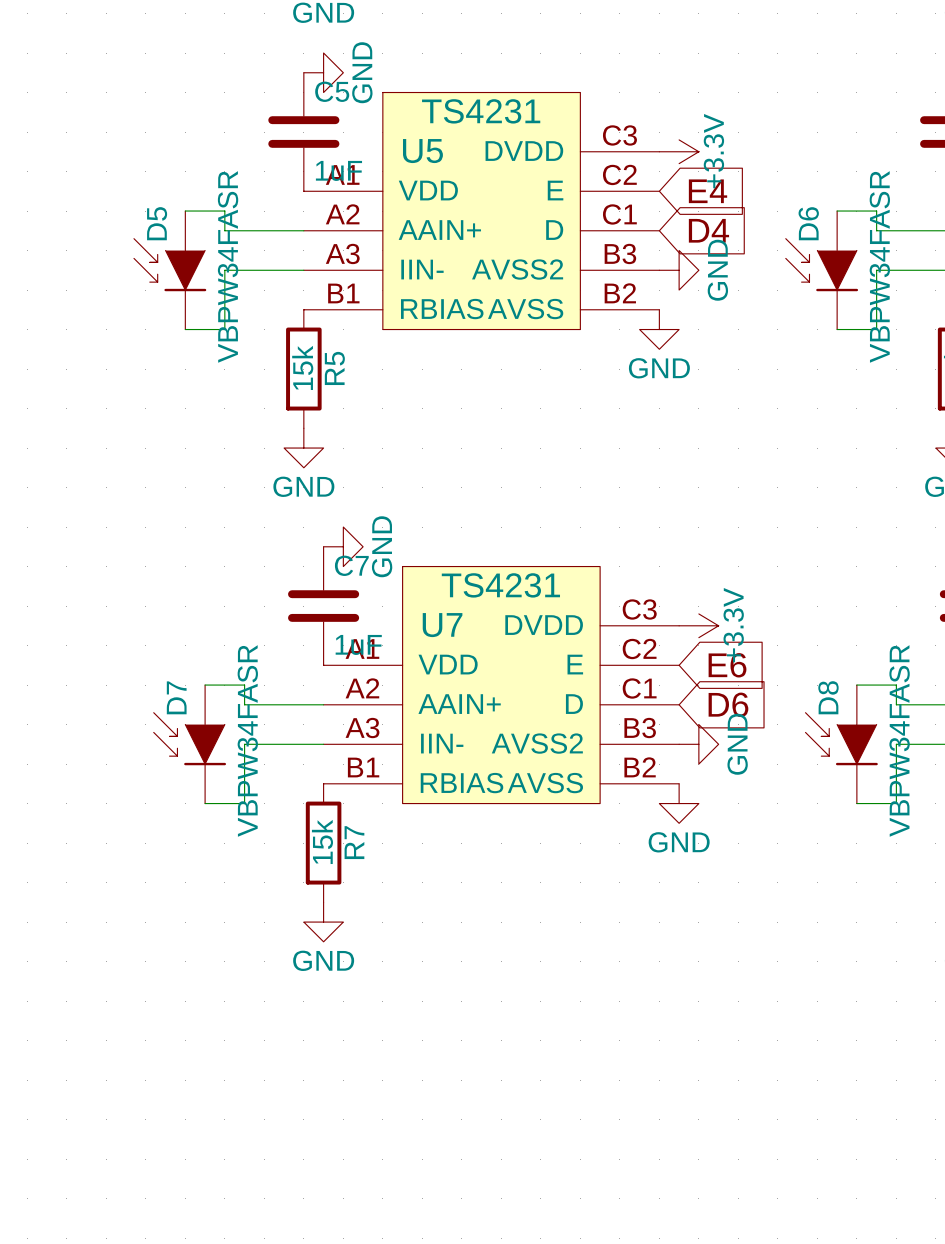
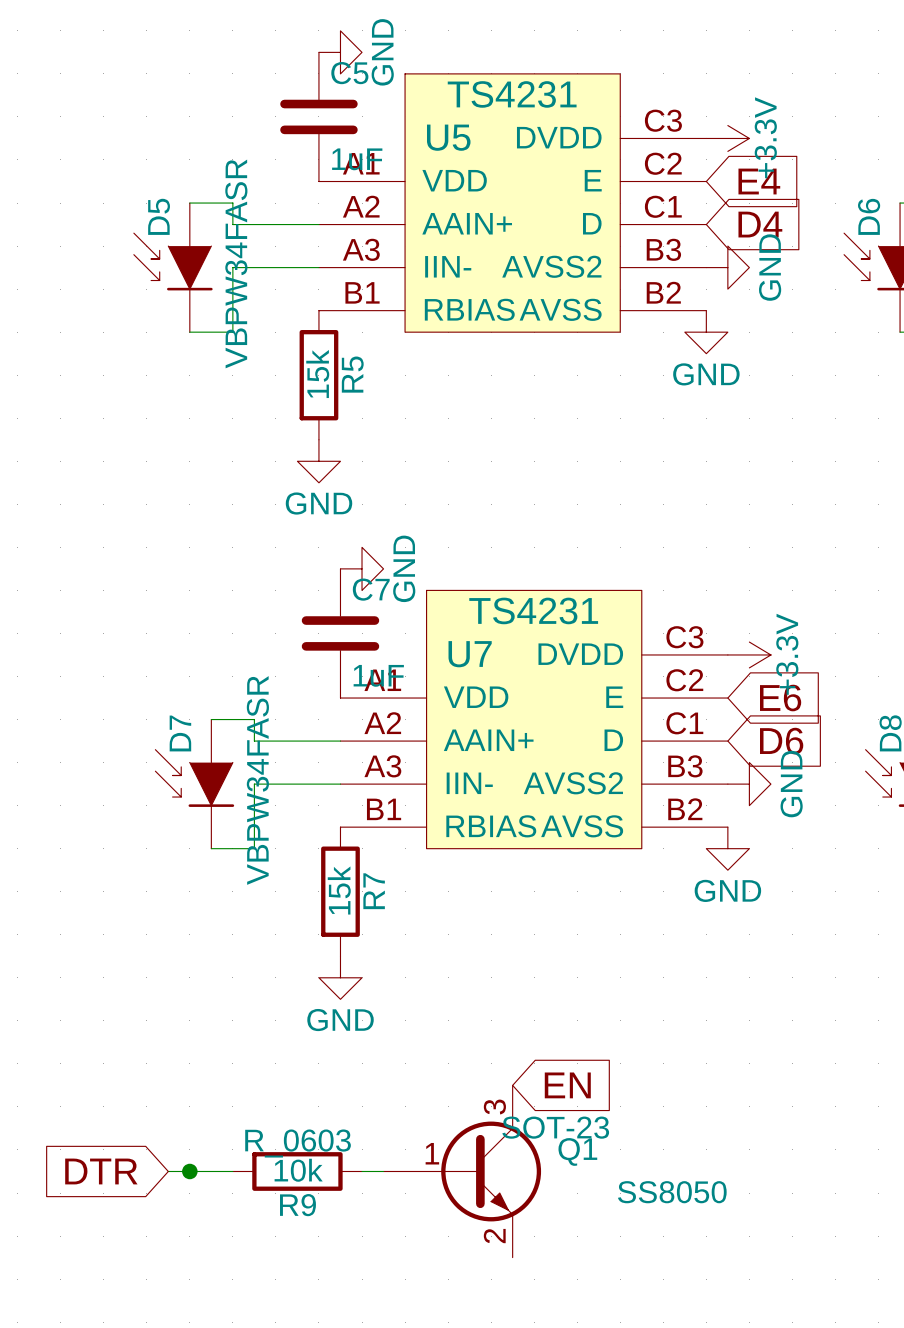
global label: none -> EN (567, 1085)
global label: none -> DTR (101, 1171)
wire: none -> (168, 1171) (232, 1171)
junction: none -> (189, 1171)
R9: none -> 10k (297, 1171)
wire: none -> (362, 1171) (383, 1171)
Q1: none -> SS8050 (462, 1171)

